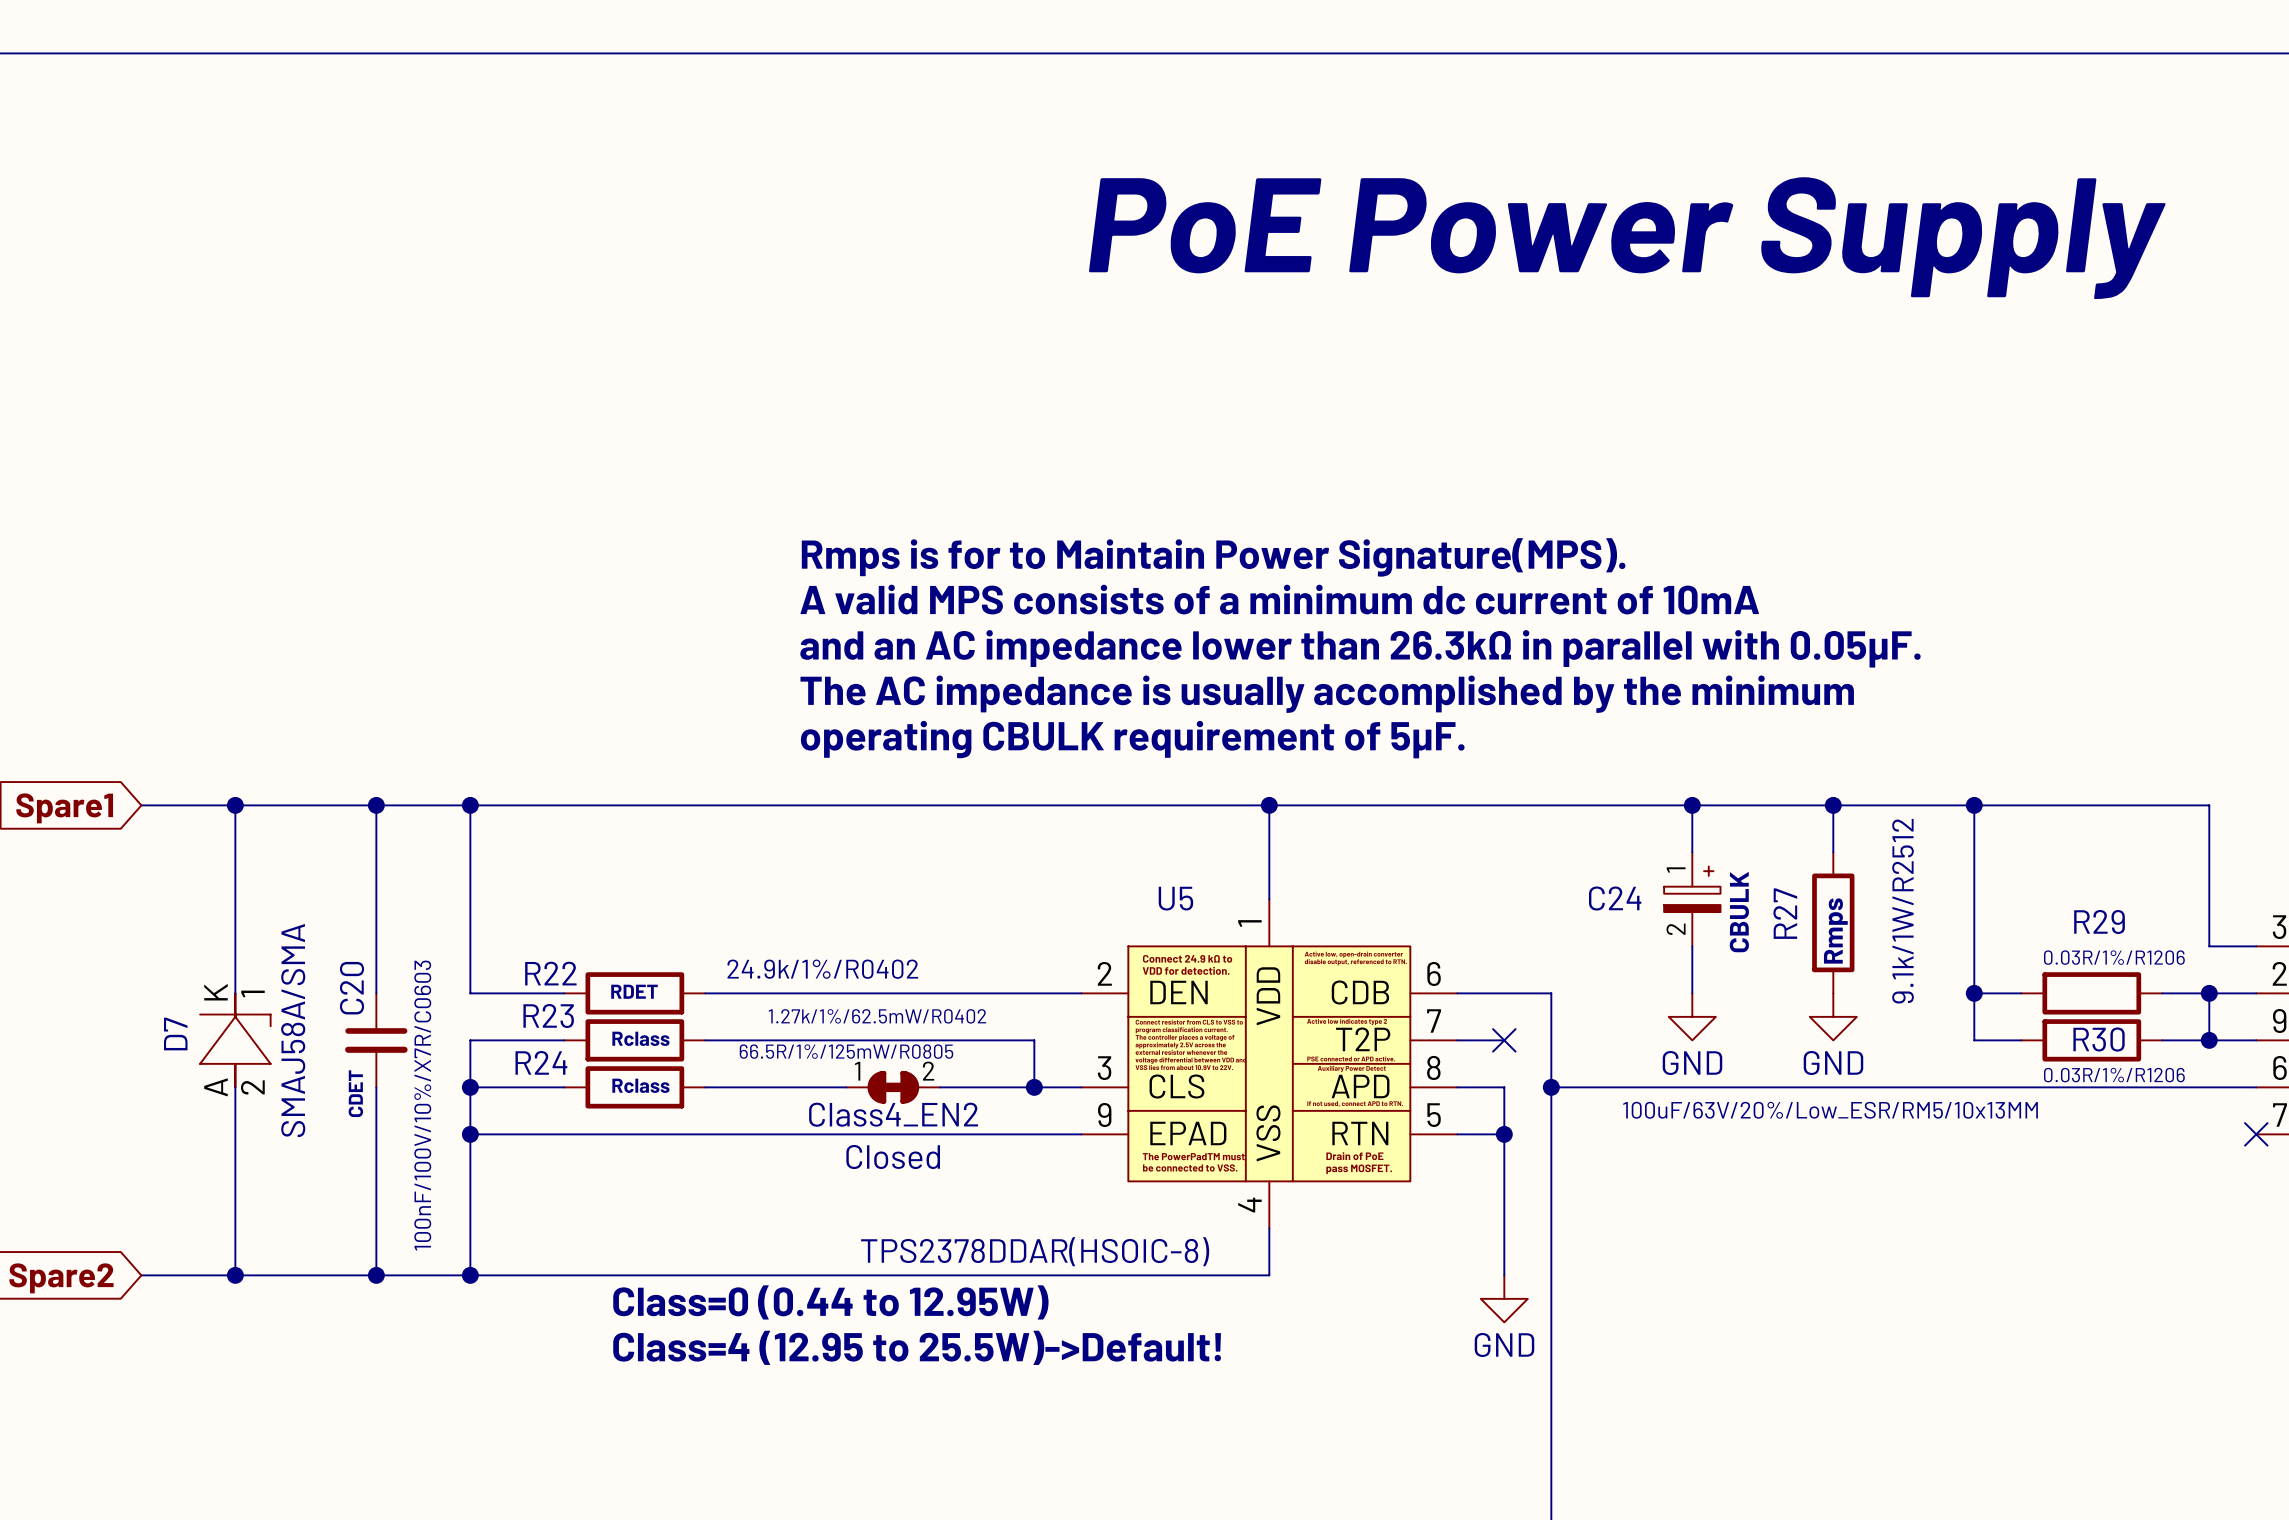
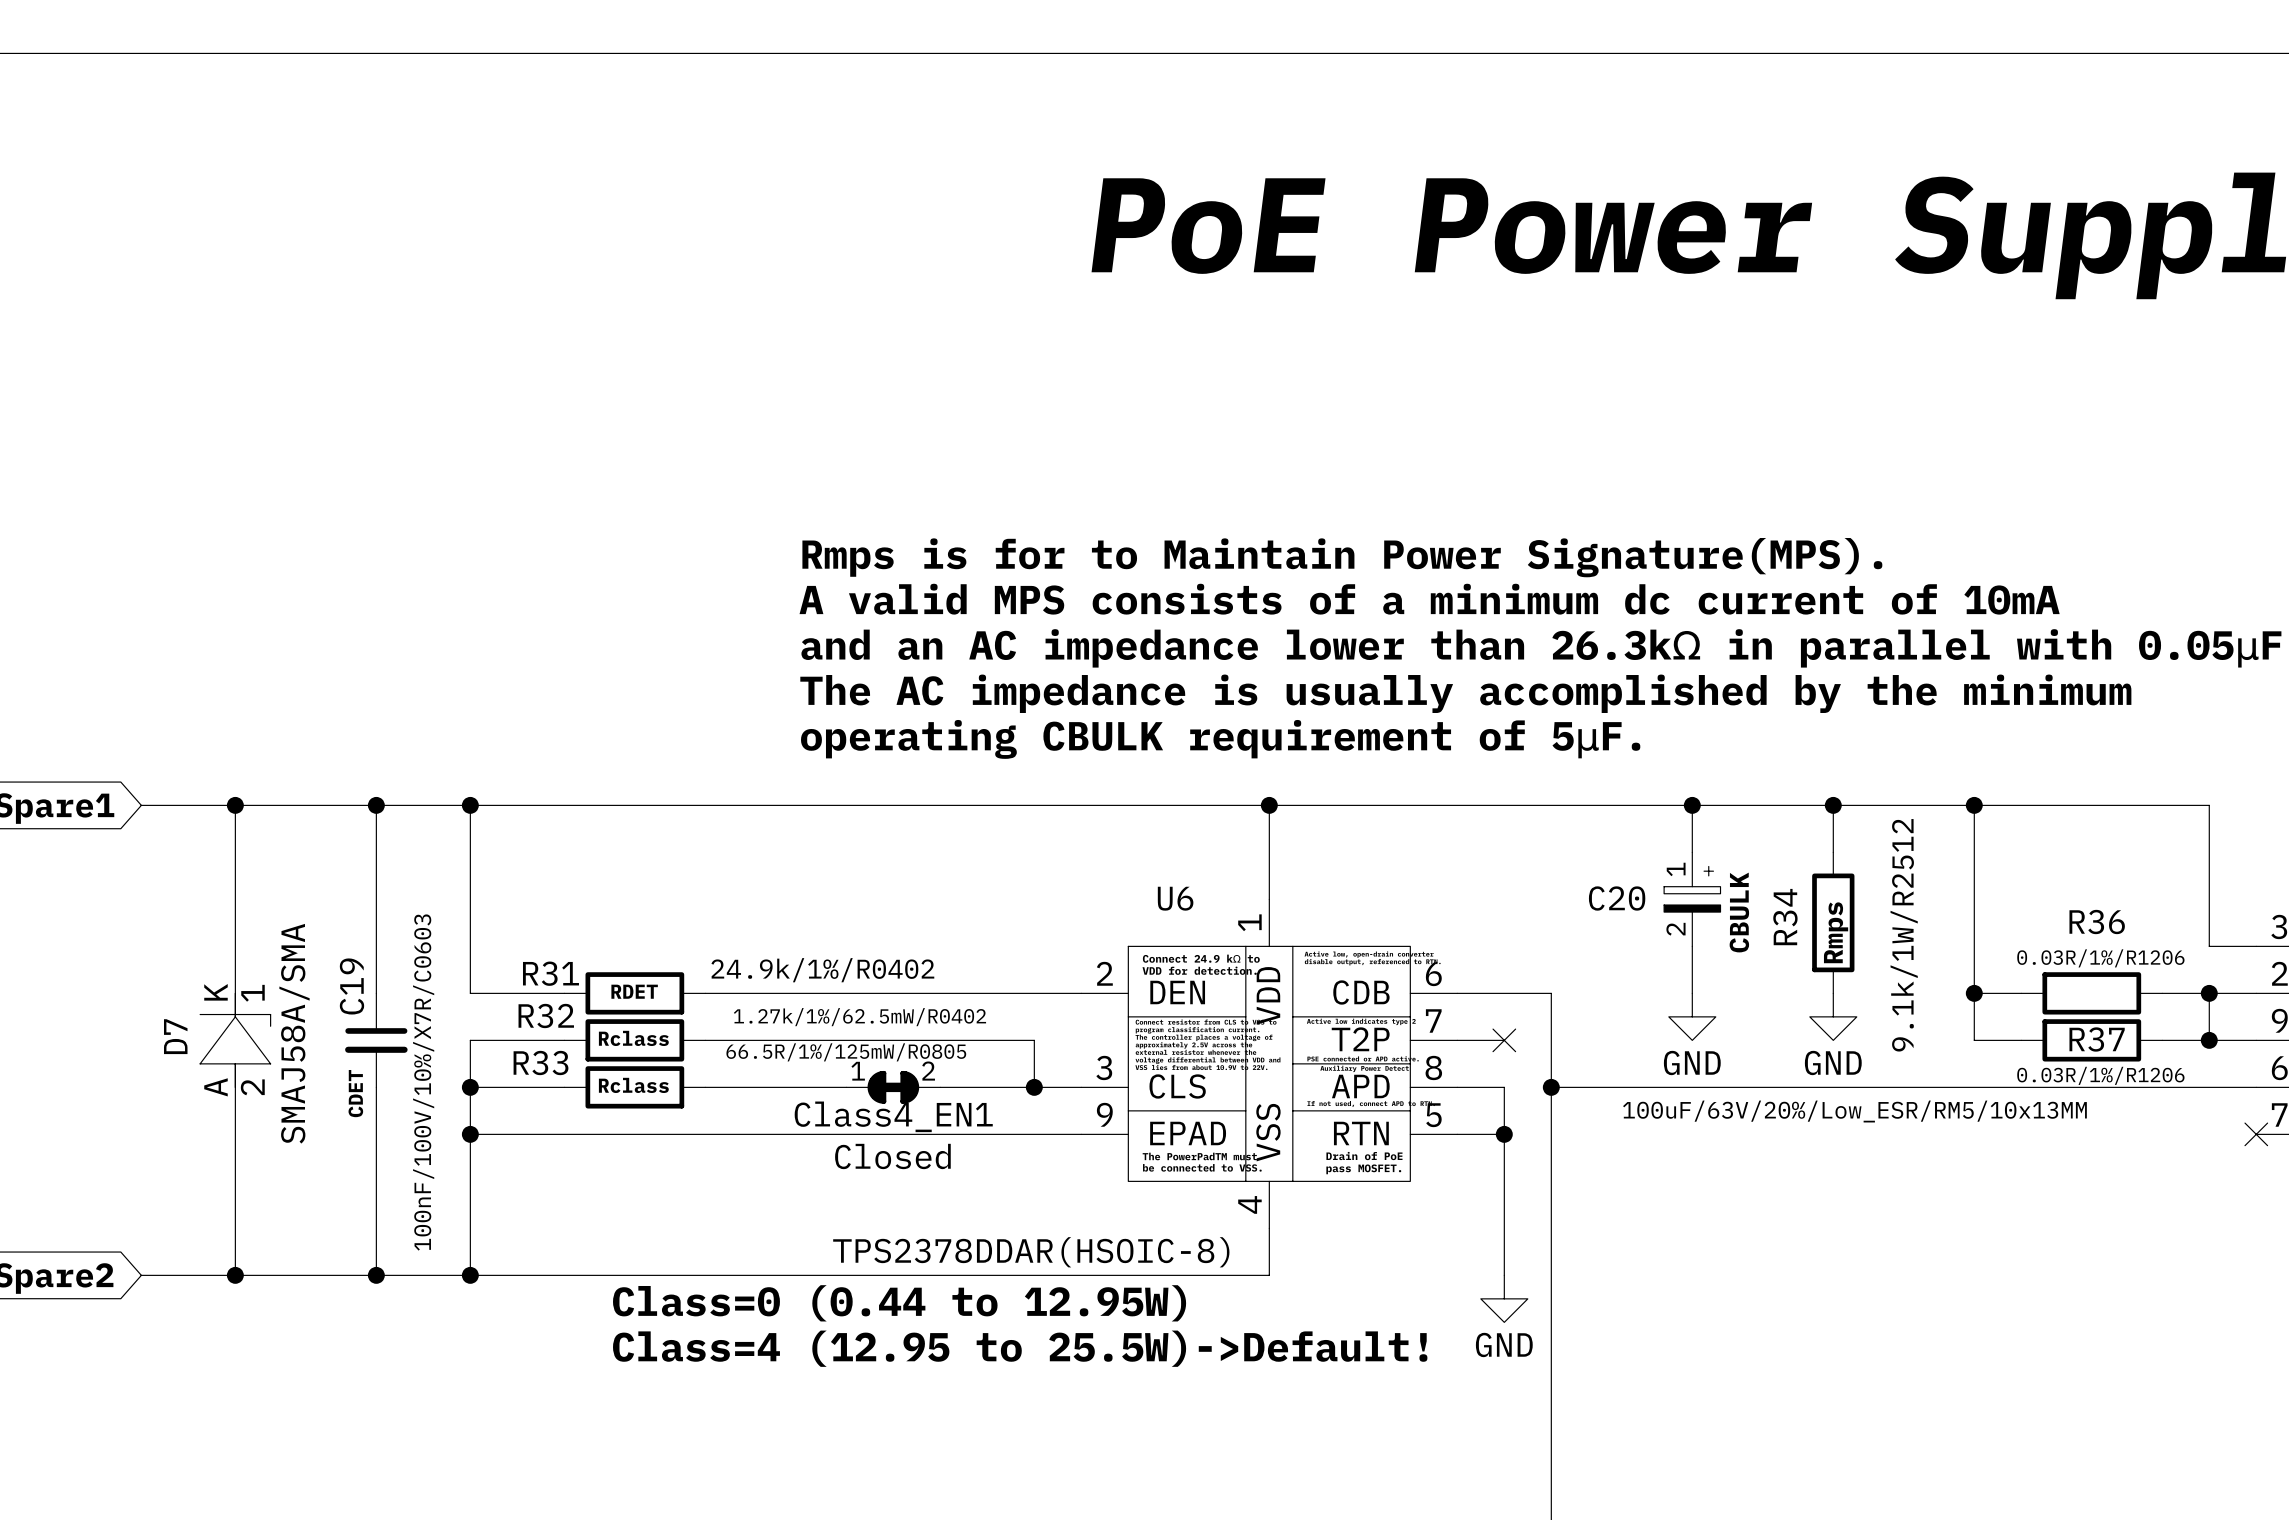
U5 name: U5 (1175, 898) -> U6 (1175, 898)
C24 name: C24 (1615, 898) -> C20 (1617, 898)
R27 name: R27 (1785, 913) -> R34 (1785, 917)
R29 name: R29 (2099, 922) -> R36 (2097, 922)
R22 name: R22 (550, 973) -> R31 (550, 973)
C20 name: C20 (352, 988) -> C19 (351, 986)
R23 name: R23 (548, 1016) -> R32 (546, 1016)
R30 name: R30 (2099, 1039) -> R37 (2097, 1039)
R24 name: R24 (541, 1062) -> R33 (540, 1062)
Class4_EN2 name: Class4_EN2 (893, 1114) -> Class4_EN1 (893, 1116)

